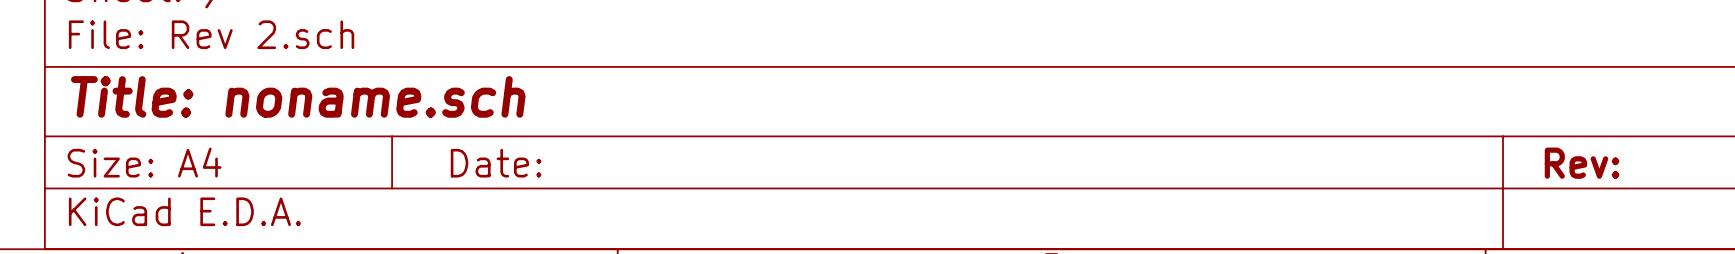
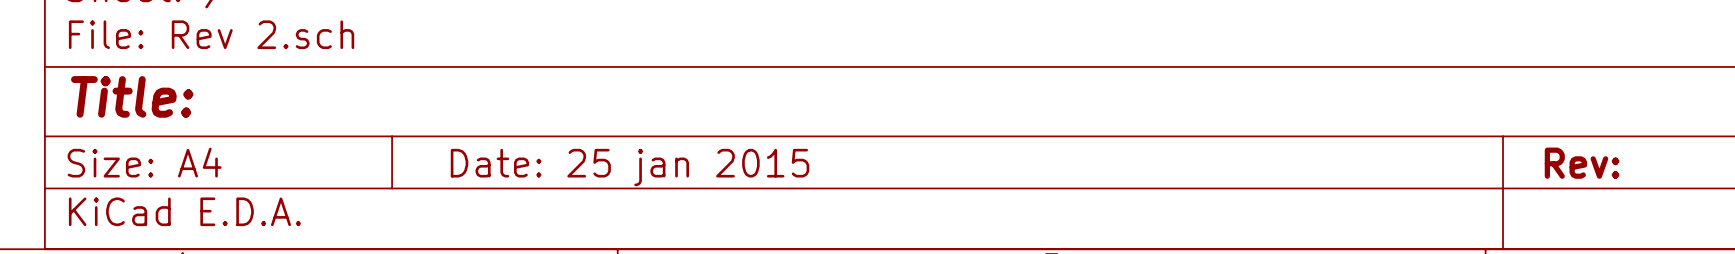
title block: Title: noname.sch (298, 96) -> Title: (132, 96)
title block: Date: (496, 163) -> Date: 25 jan 2015 (630, 167)

